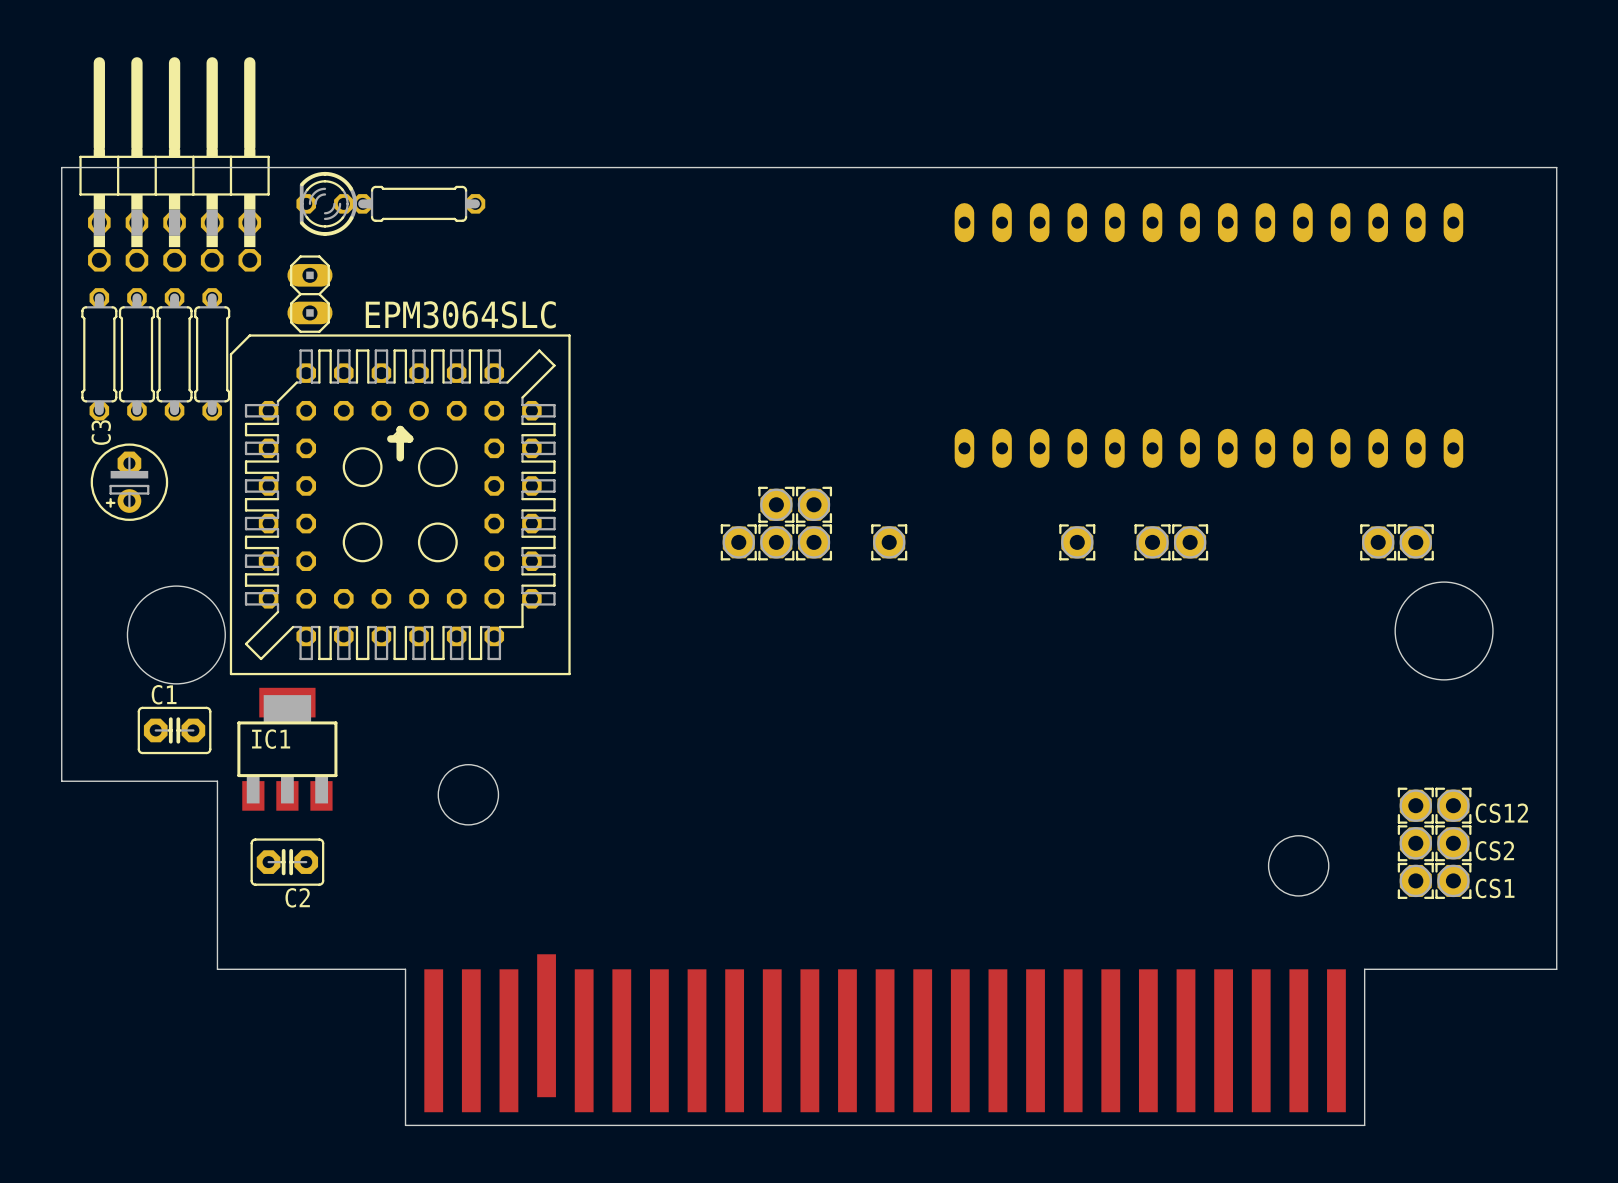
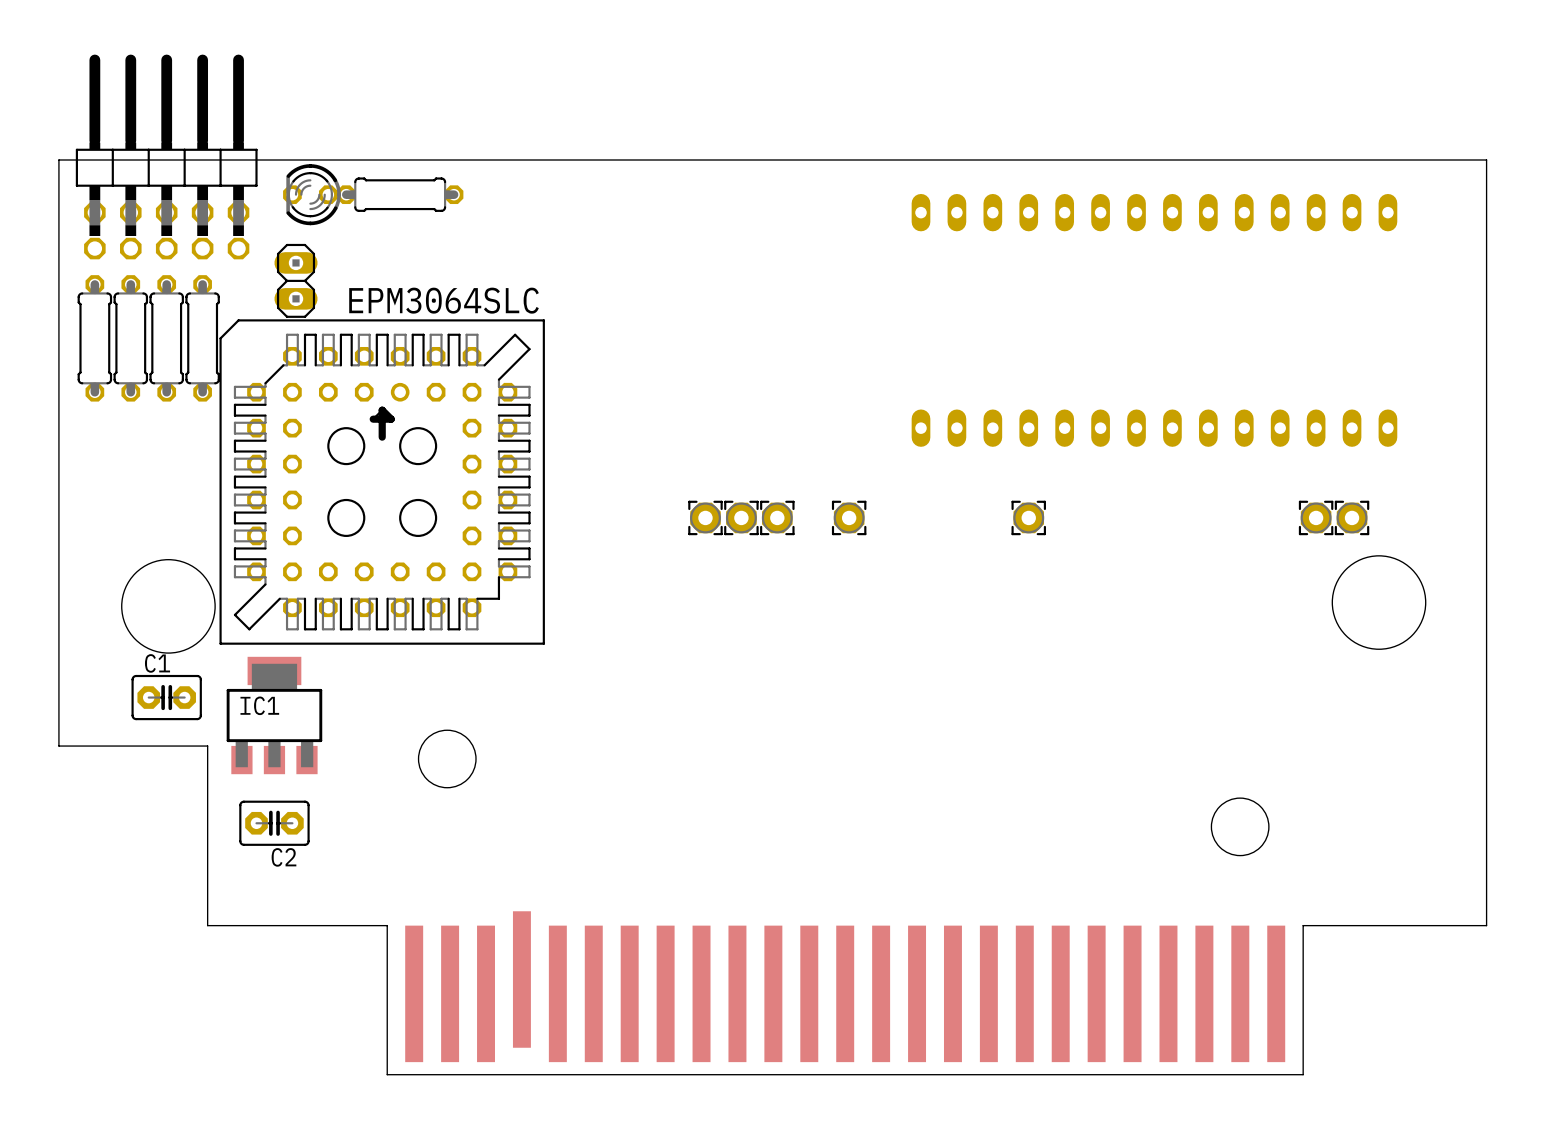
C3: (129, 482) -> none
part: (776, 504) -> none
part: (813, 504) -> none
part: (1152, 542) -> none
part: (1190, 542) -> none
CS12: (1415, 805) -> none
part: (1453, 805) -> none
CS2: (1415, 843) -> none
part: (1453, 843) -> none
CS1: (1415, 880) -> none
part: (1453, 880) -> none

